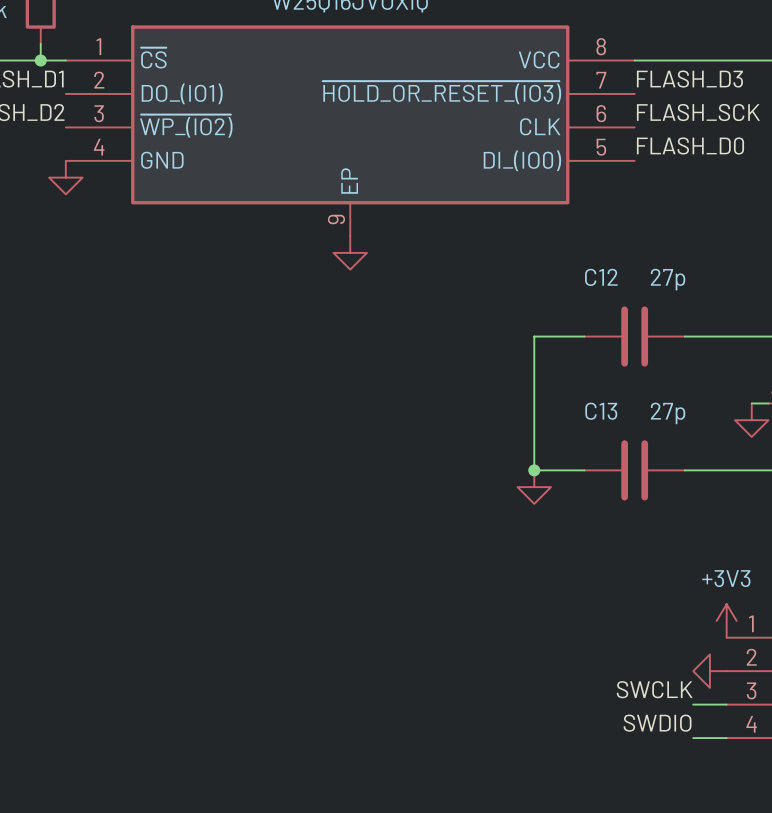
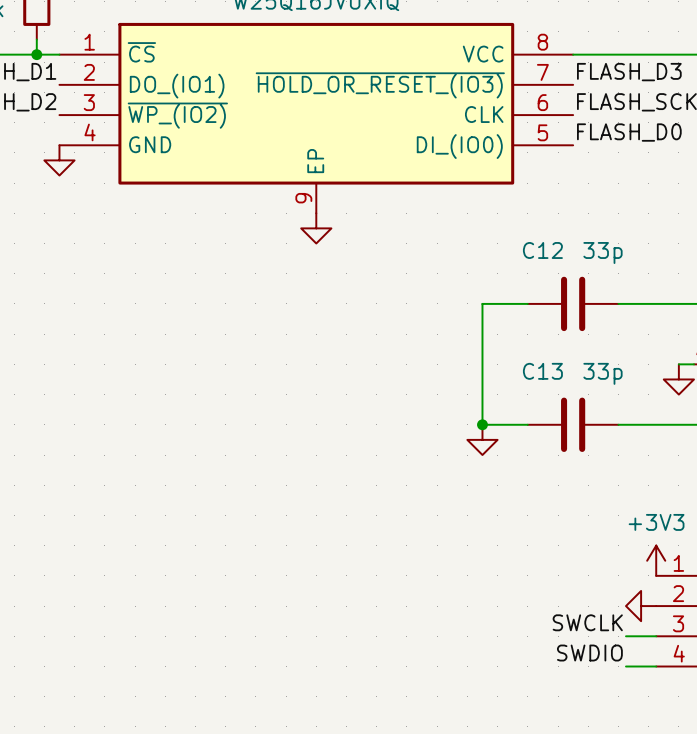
C12 value: 27p (668, 279) -> 33p (602, 253)
C13 value: 27p (668, 413) -> 33p (602, 373)

